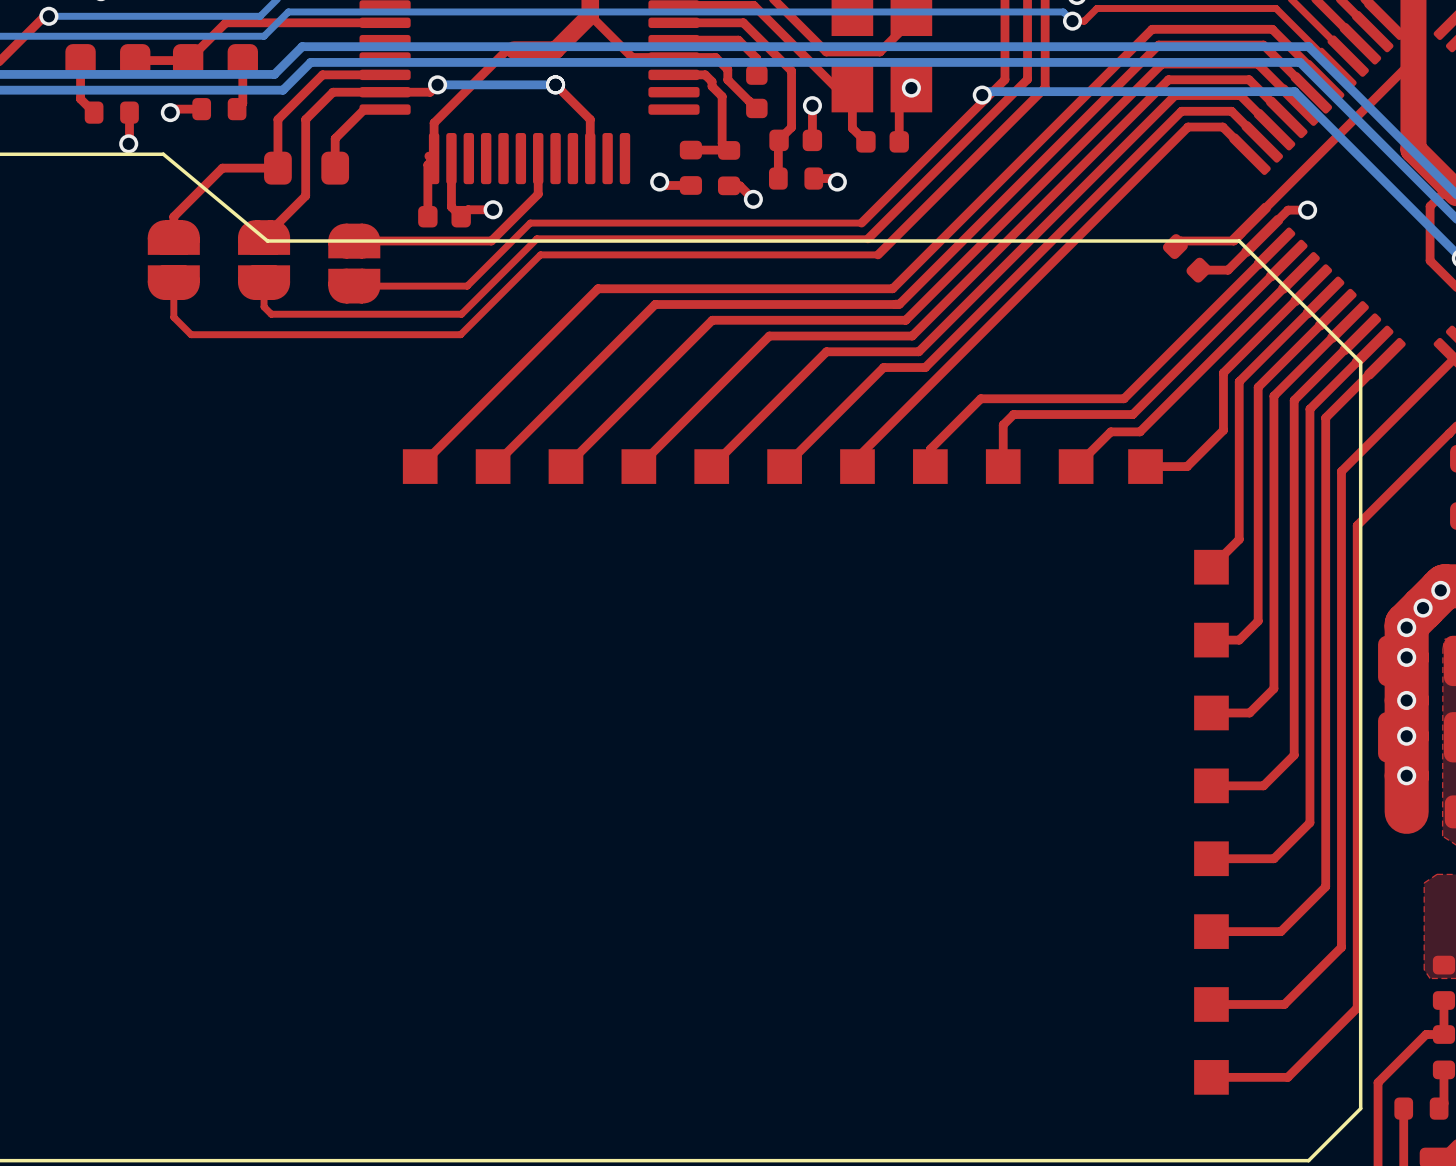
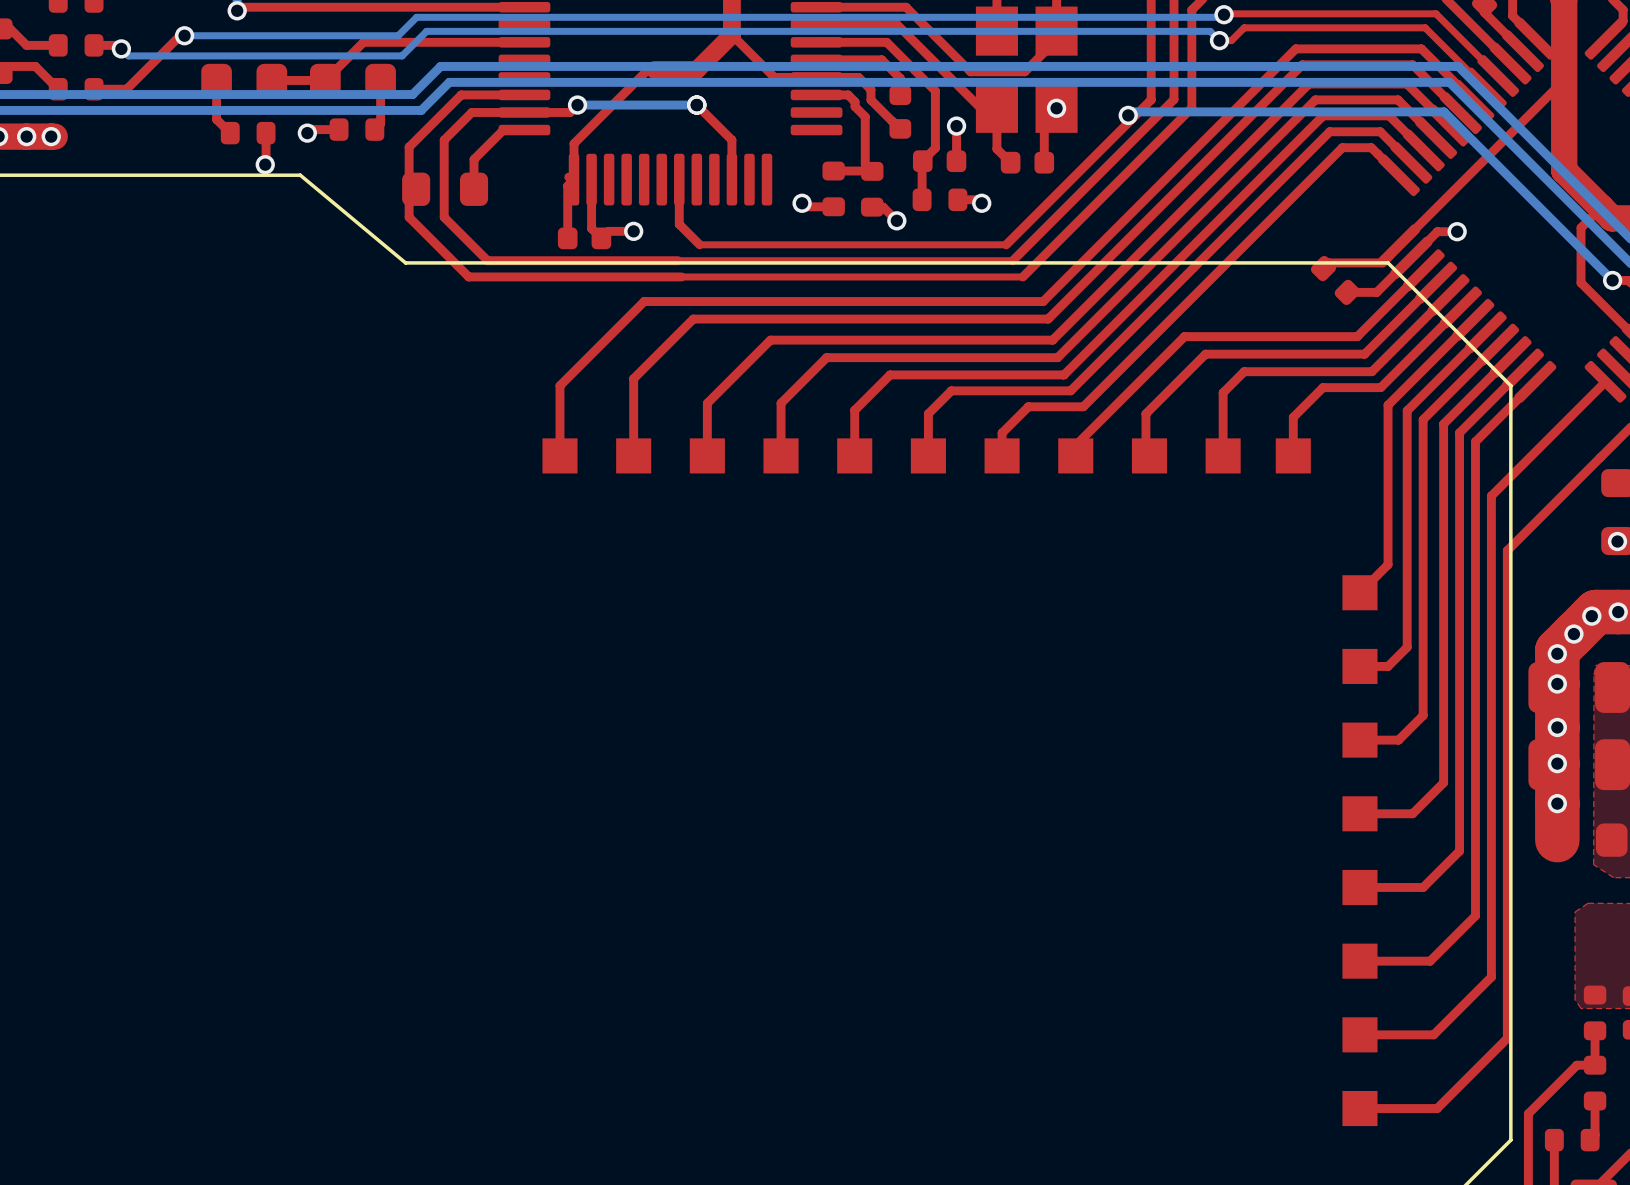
top track: (1152, 29) (892, 288) (598, 288) (420, 466) -> (1299, 48) (1295, 48) (1043, 301) (644, 301) (559, 385) (559, 455)
top track: (1158, 45) (899, 304) (895, 304) -> (1306, 64) (1302, 64) (1048, 319) (693, 319) (633, 378) (633, 455)
top track: (1161, 64) (905, 320) (712, 320) (565, 466) -> (1309, 83) (1052, 340) (770, 340) (707, 403) (707, 455)
top track: (1168, 79) (912, 336) (769, 336) (638, 466) -> (1316, 99) (1057, 357) (826, 357) (781, 403) (781, 455)
top track: (277, 119) (277, 168) (222, 168) (173, 216) (173, 237) -> none
top track: (1194, 127) (1188, 127) (857, 457) (857, 466) -> (1342, 147) (1083, 406) (1028, 406) (1002, 433) (1002, 455)
top track: (538, 194) (491, 241) (354, 241) -> (679, 215) (679, 224) (699, 244)
top track: (305, 195) (264, 237) -> none
top track: (558, 223) (530, 223) (467, 286) (354, 286) -> none
top track: (536, 238) (461, 314) (271, 314) (264, 306) (264, 282) -> (677, 260) (487, 260) (444, 217)
top track: (540, 254) (460, 334) (191, 334) (173, 317) (173, 282) -> (681, 276) (468, 276) (409, 217) (409, 147) (416, 140)
part: (173, 260) -> none
part: (264, 260) -> none
part: (354, 263) -> none
top track: (895, 304) (655, 304) (493, 466) -> none
top track: (1208, 313) (1123, 398) (980, 398) (930, 449) (930, 466) -> (1357, 336) (1184, 336) (1075, 445) (1075, 455) (1072, 455)
top track: (1216, 331) (1132, 414) (1013, 414) (1003, 424) (1003, 466) -> (1364, 354) (1205, 354) (1145, 413) (1145, 455)
top track: (1223, 348) (1139, 431) (1110, 431) (1076, 466) -> (1371, 371) (1244, 371) (1223, 392) (1223, 455)
top track: (826, 351) (711, 466) -> (970, 374) (890, 374) (854, 410) (854, 455)
top track: (1232, 364) (1223, 372) (1223, 430) (1187, 466) (1145, 466) (1149, 463) -> (1380, 387) (1322, 387) (1293, 417) (1293, 455) (1296, 459)
top track: (883, 367) (784, 466) -> (1028, 390) (951, 390) (928, 413) (928, 455)
part position: (420, 466) -> (559, 455)
part position: (493, 466) -> (633, 455)
part position: (565, 466) -> (707, 455)
part position: (638, 466) -> (781, 455)
part position: (711, 466) -> (854, 455)
part position: (784, 466) -> (928, 455)
part position: (857, 466) -> (1002, 455)
part position: (930, 466) -> (1075, 455)
part position: (1003, 466) -> (1149, 455)
part position: (1076, 466) -> (1223, 455)
part position: (1145, 466) -> (1293, 455)

